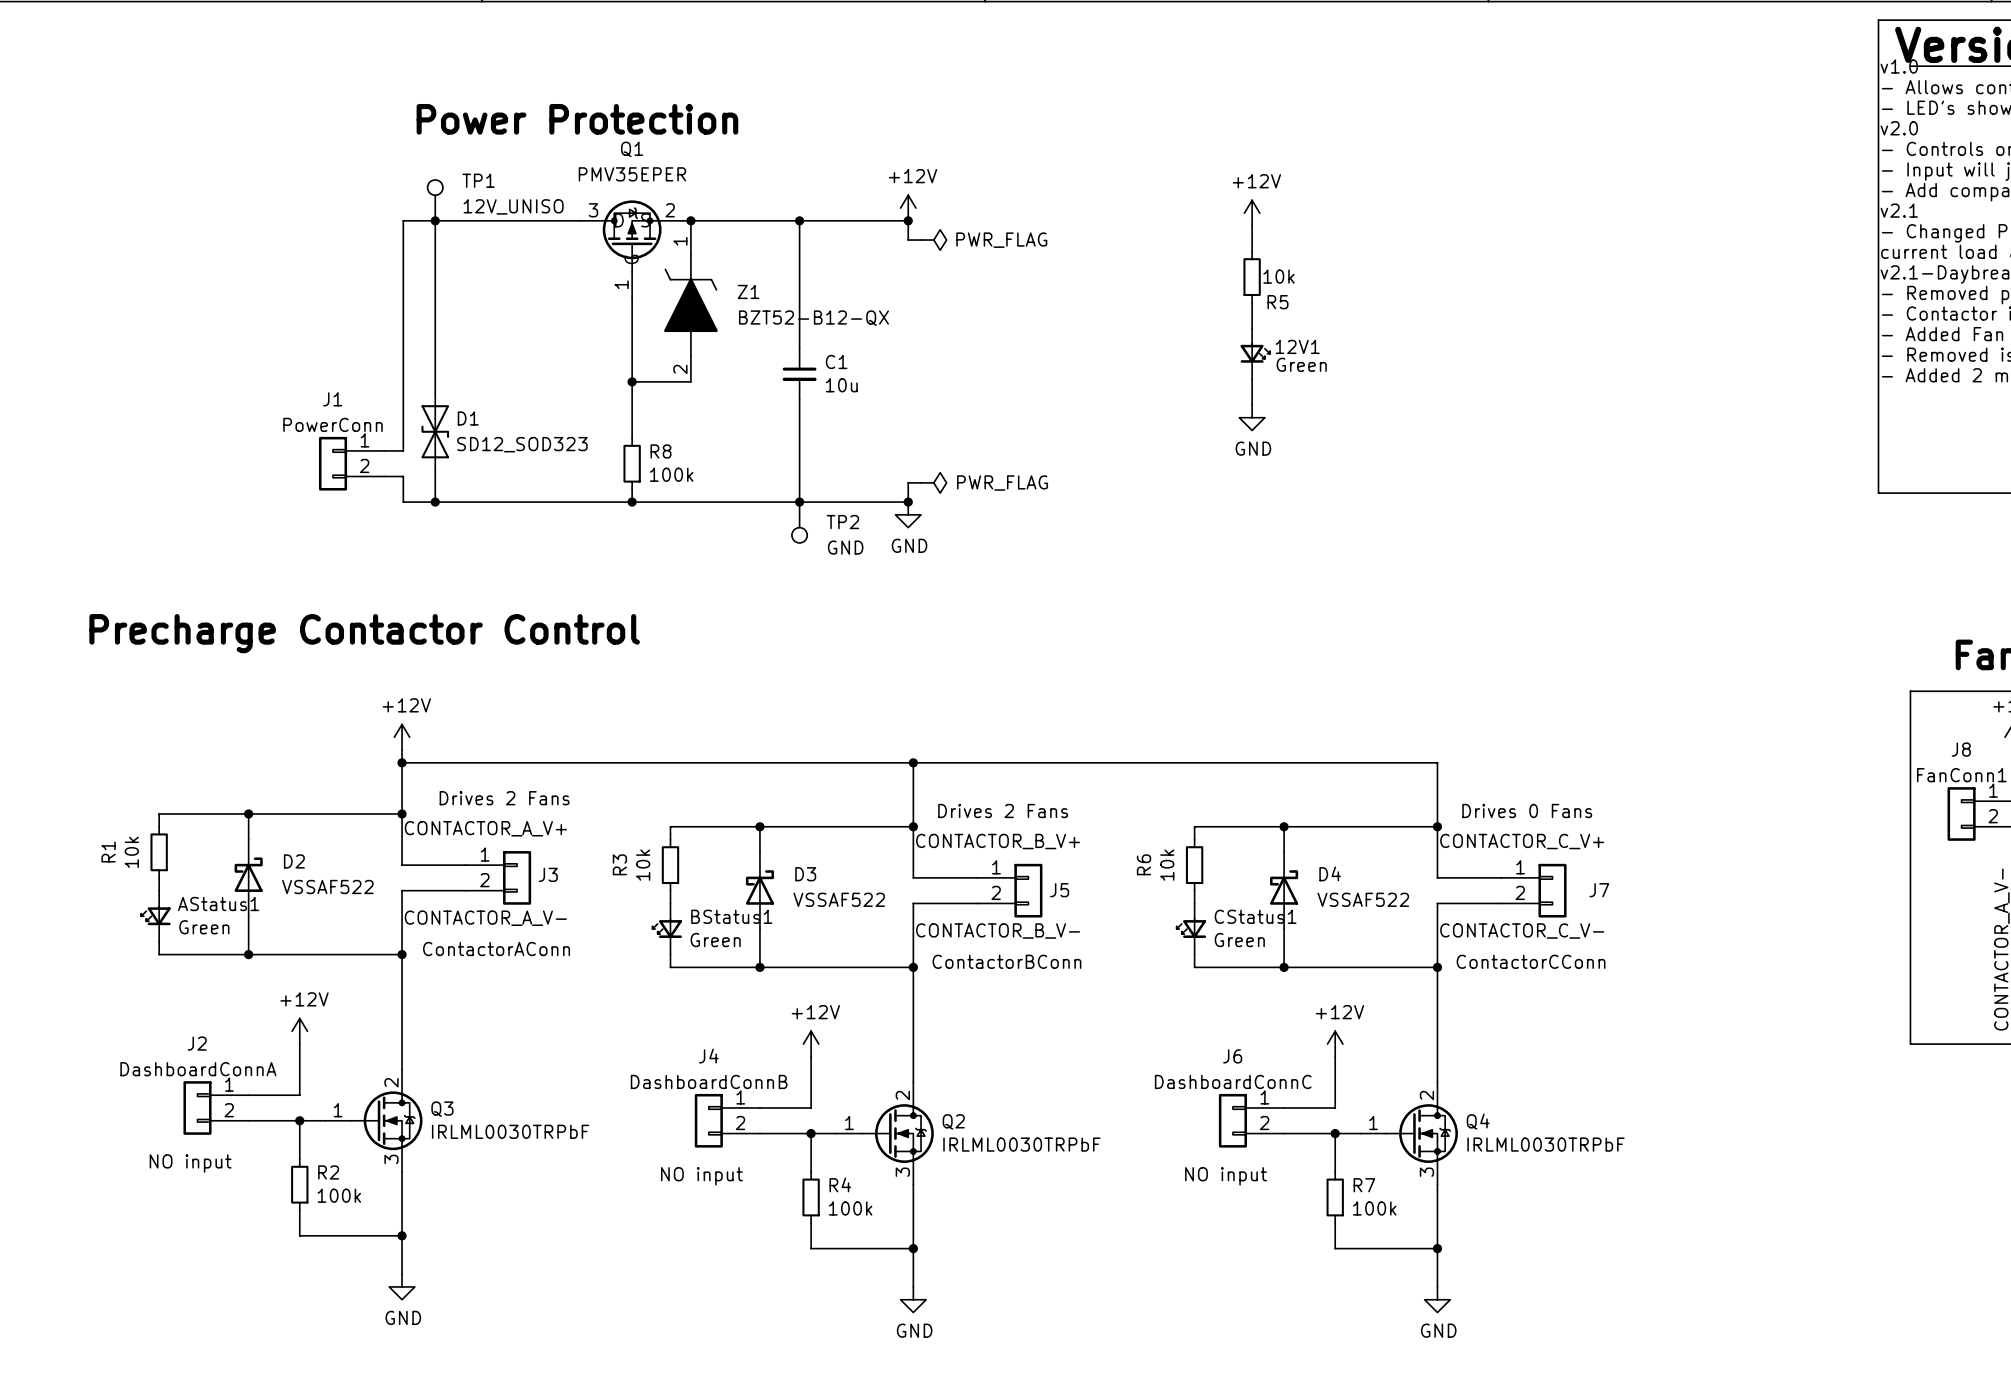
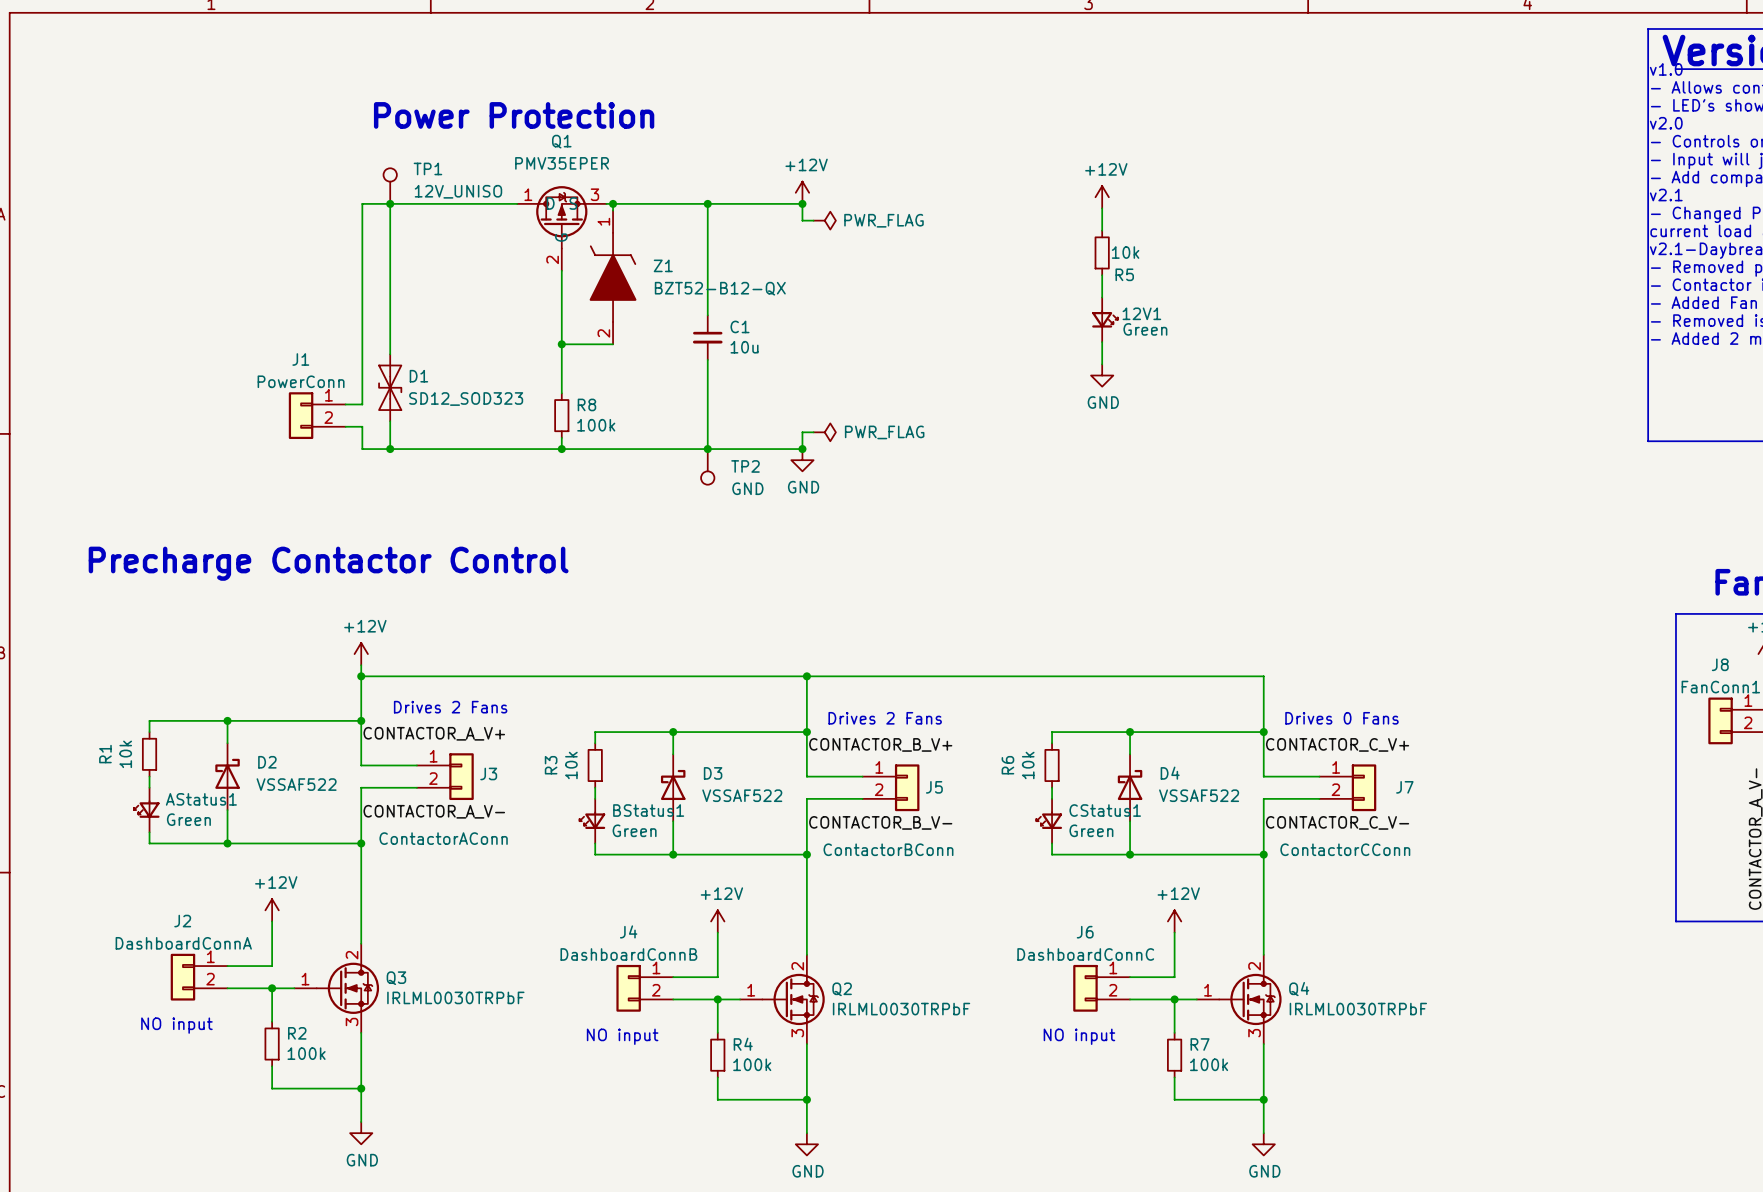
Q1 pin number: 3 (593, 210) -> 1 (528, 194)
Q1 pin number: 2 (670, 210) -> 3 (594, 194)
Q1 pin number: 1 (621, 284) -> 2 (552, 259)

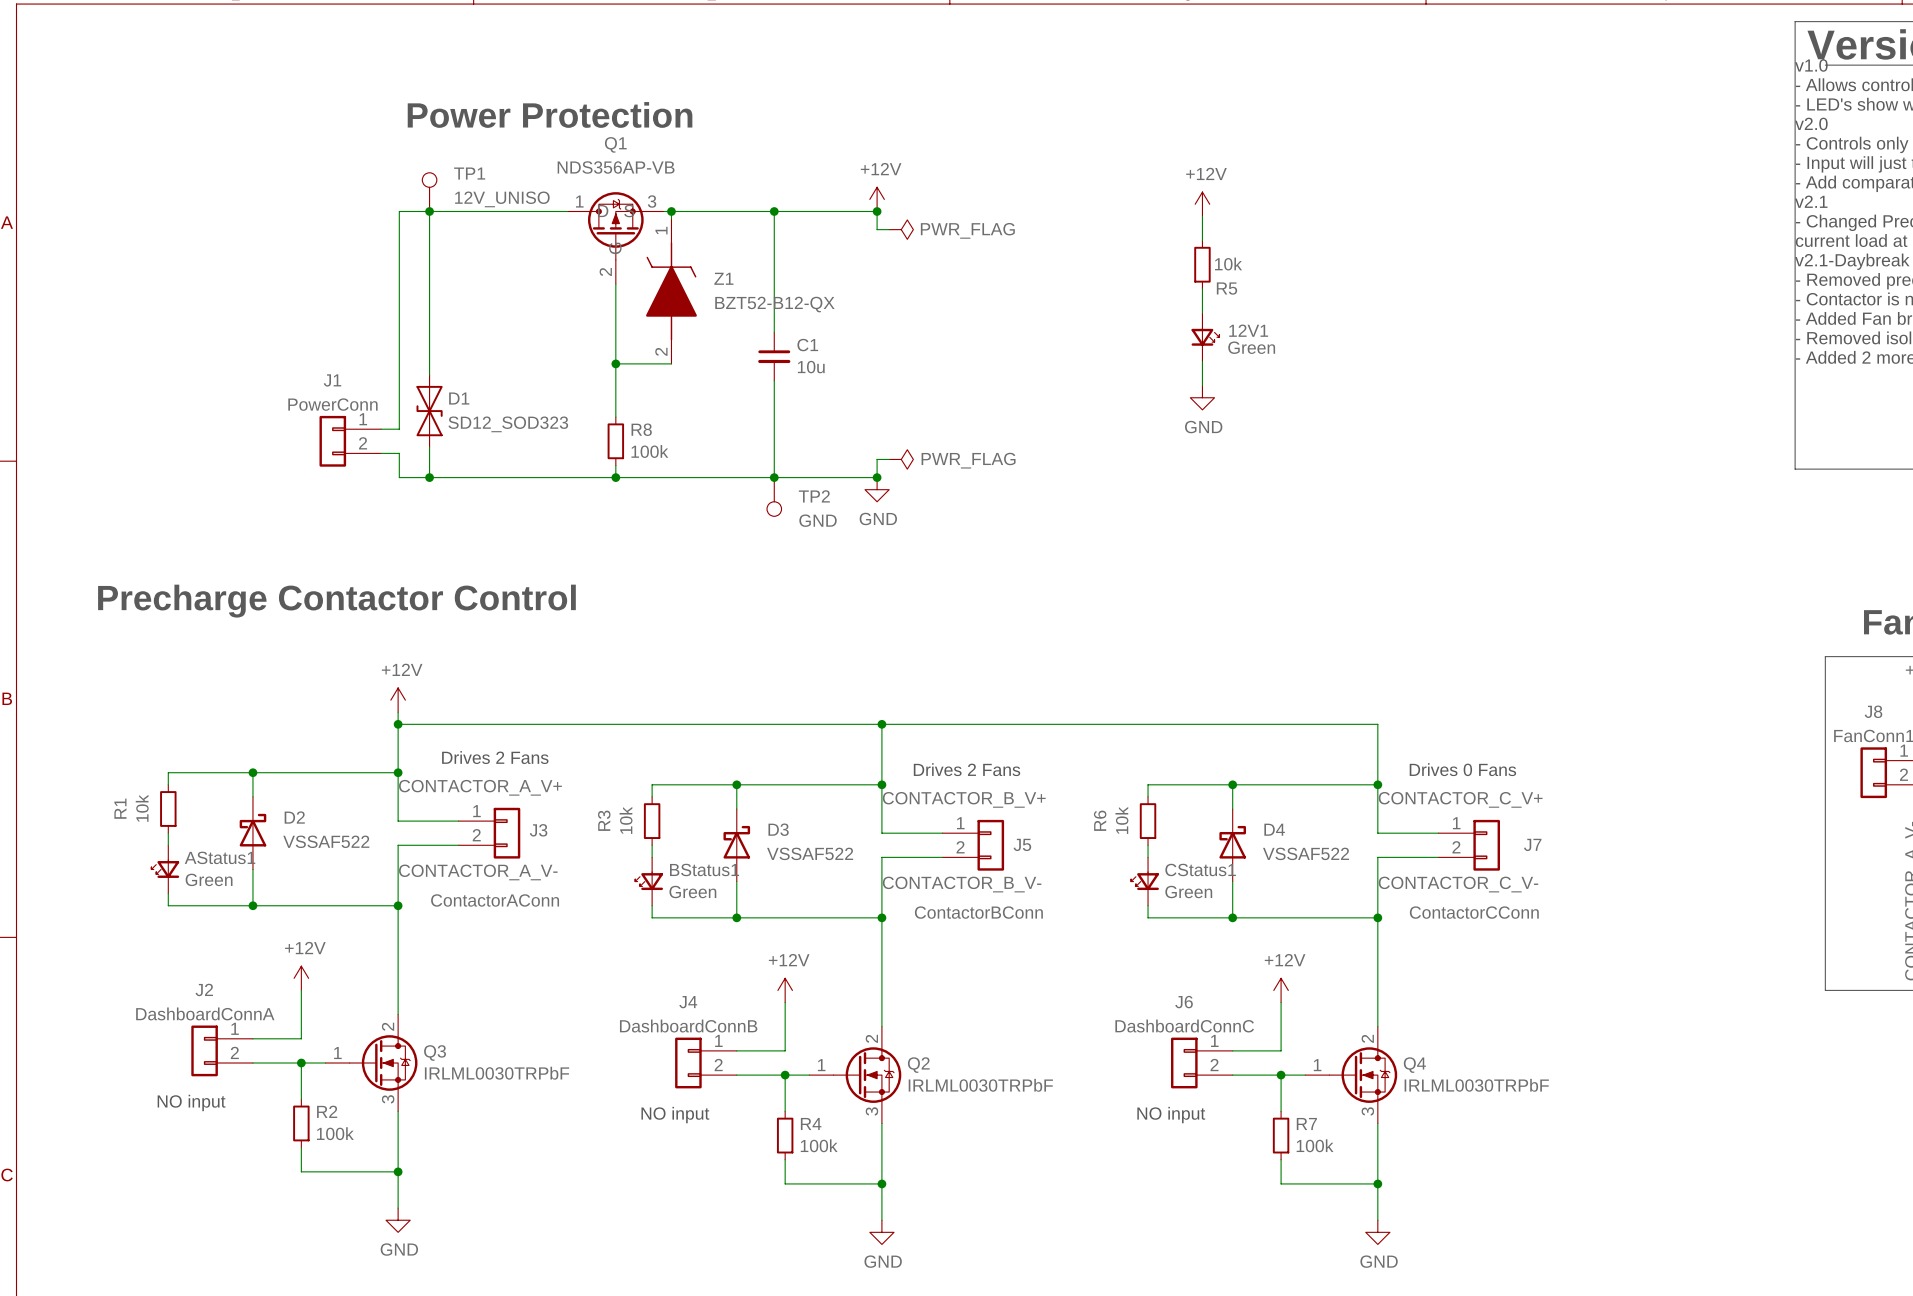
Q1 value: PMV35EPER (562, 163) -> NDS356AP-VB (616, 167)

